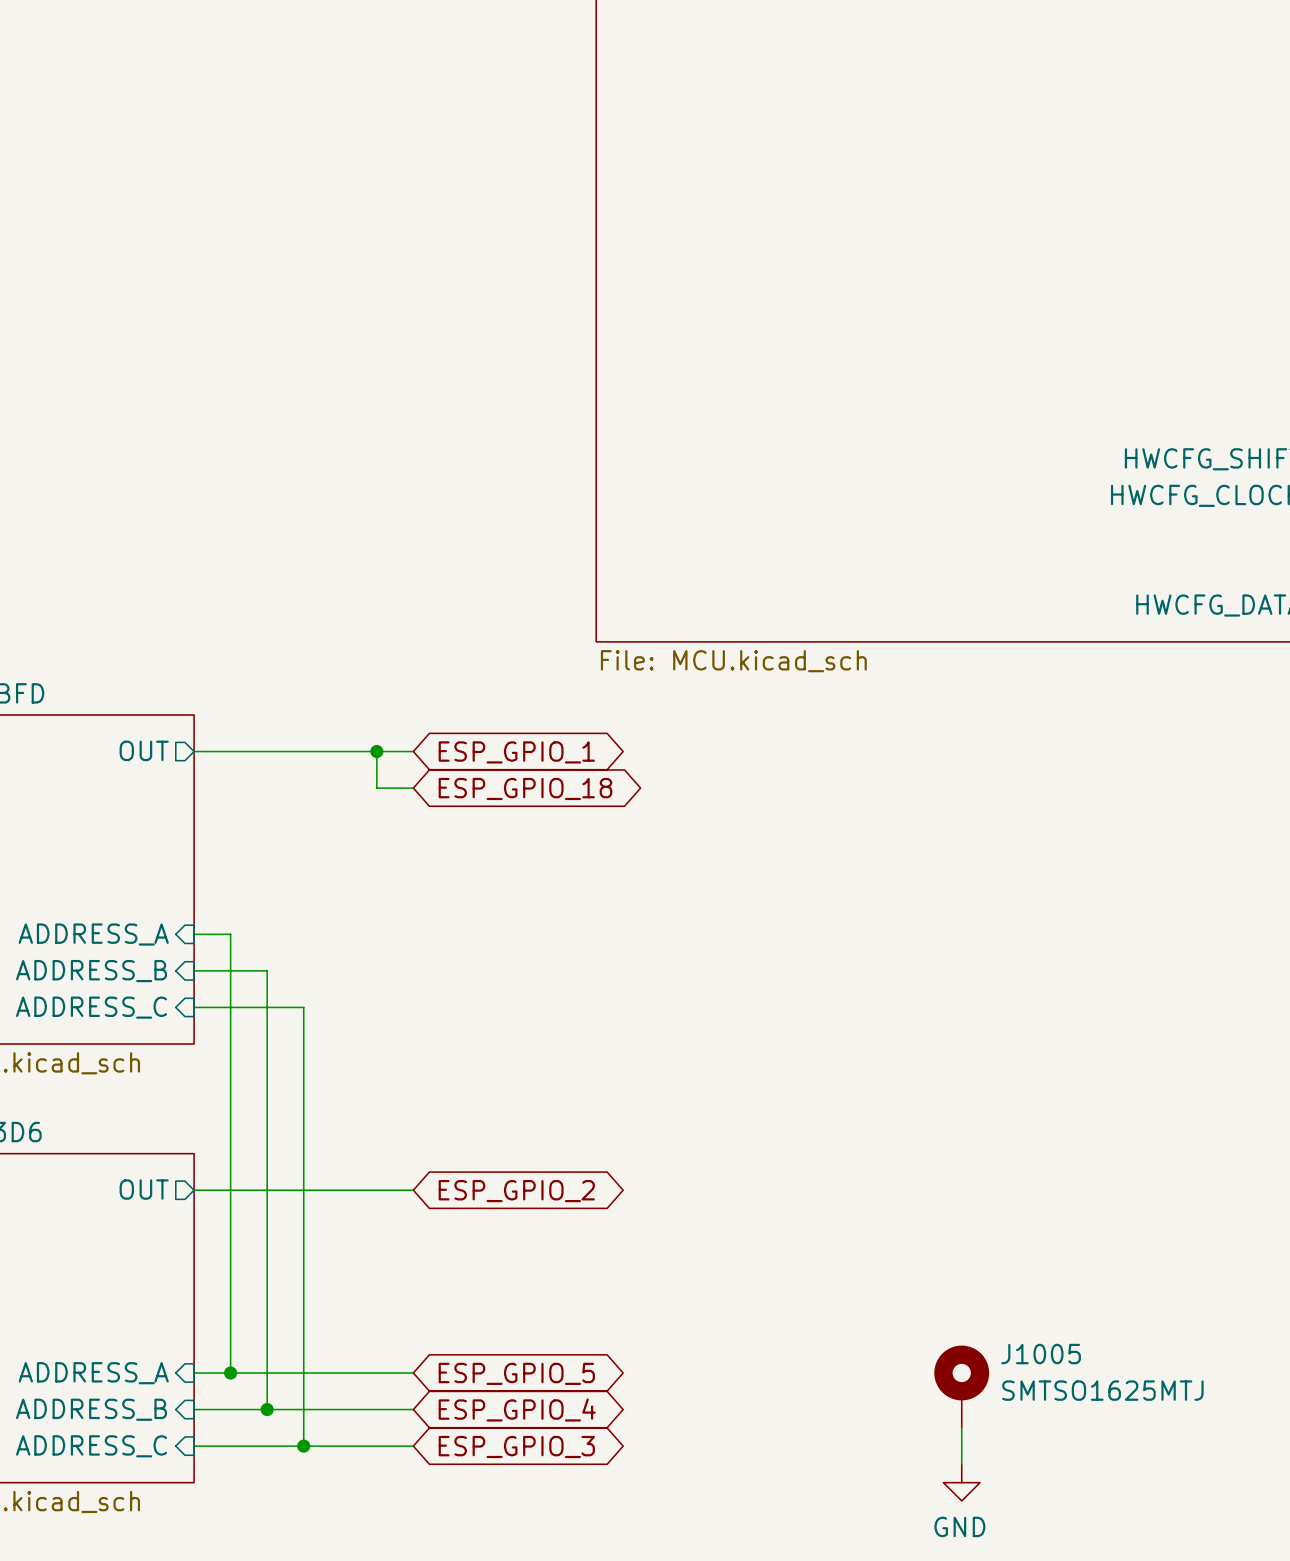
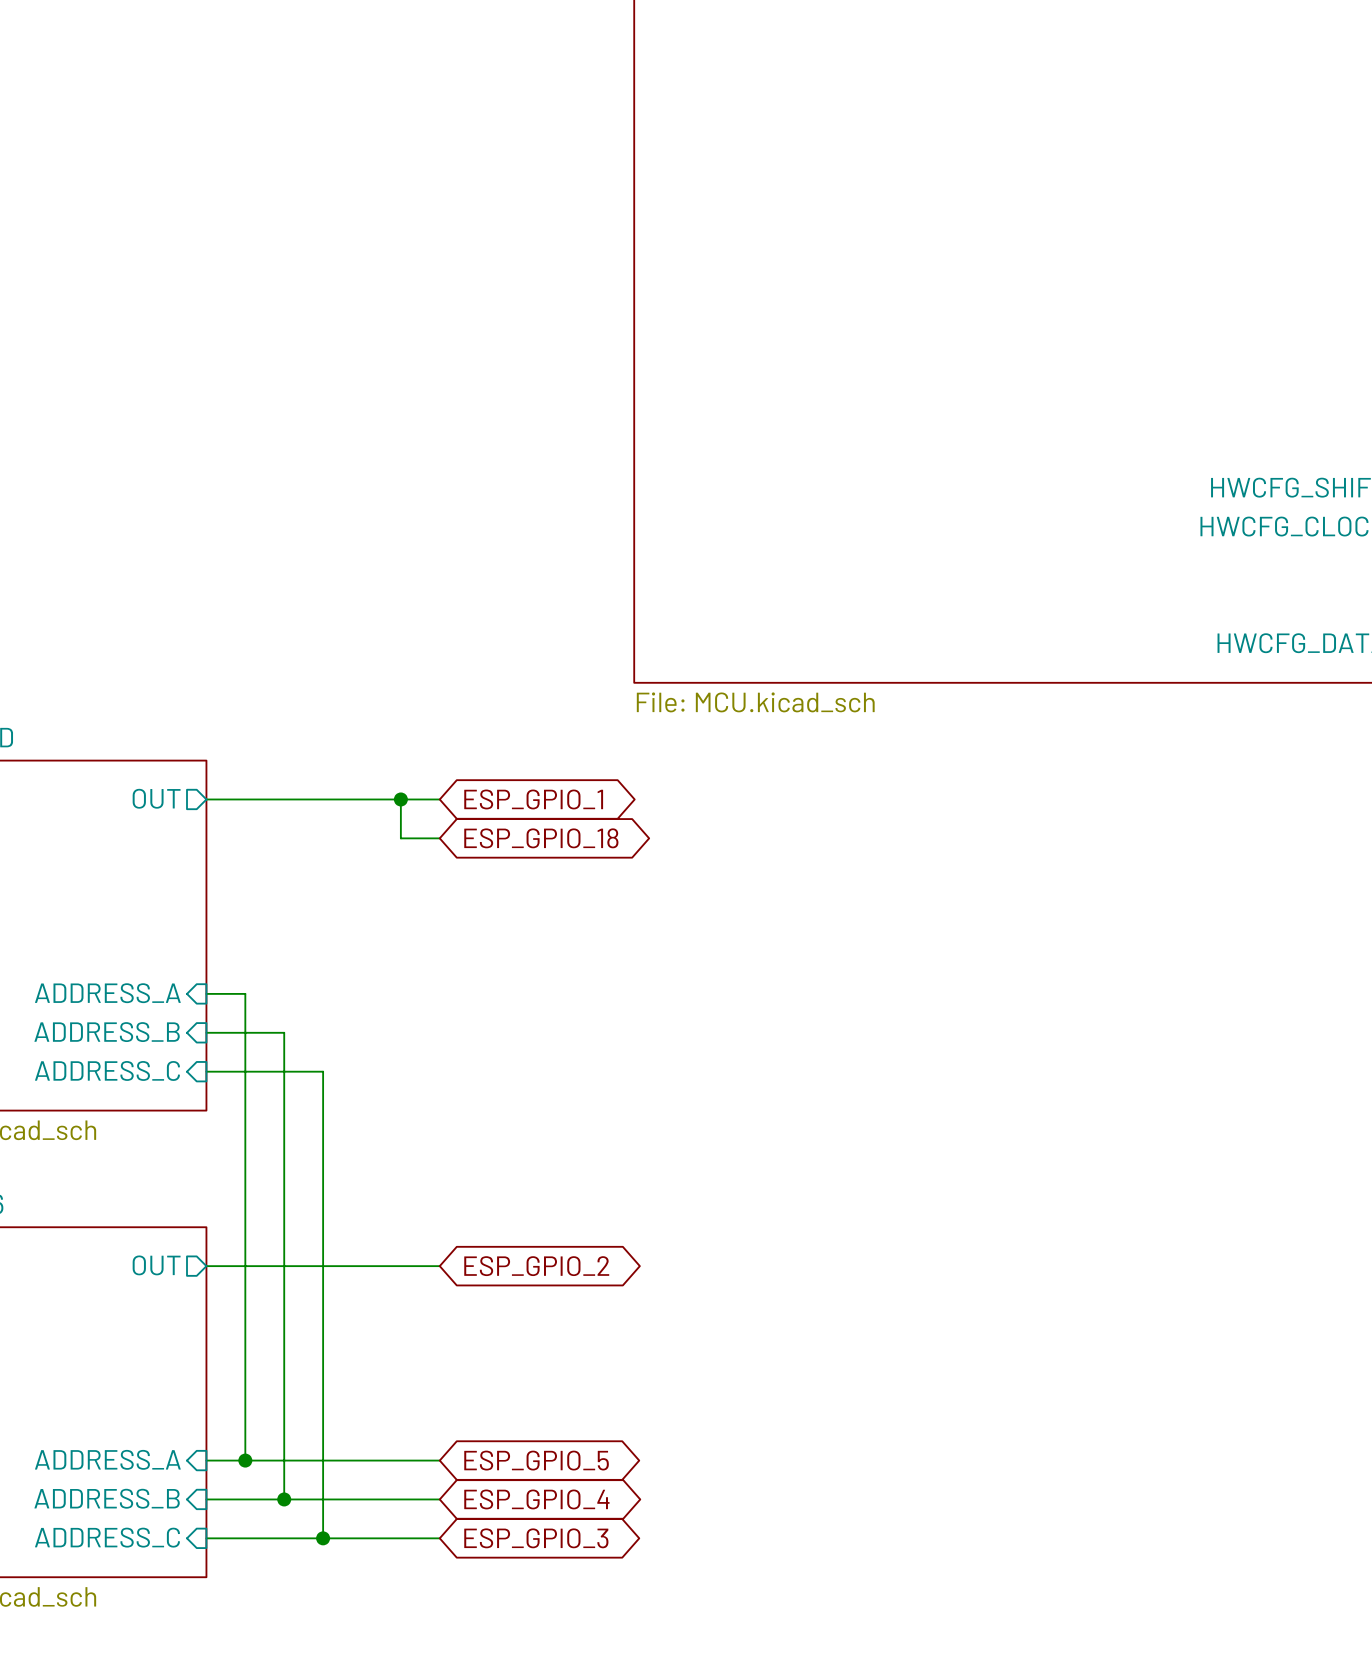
J1005: SMTSO1625MTJ (961, 1386) -> none
wire: (961, 1427) (961, 1464) -> none
power symbol: GND (961, 1482) -> none

